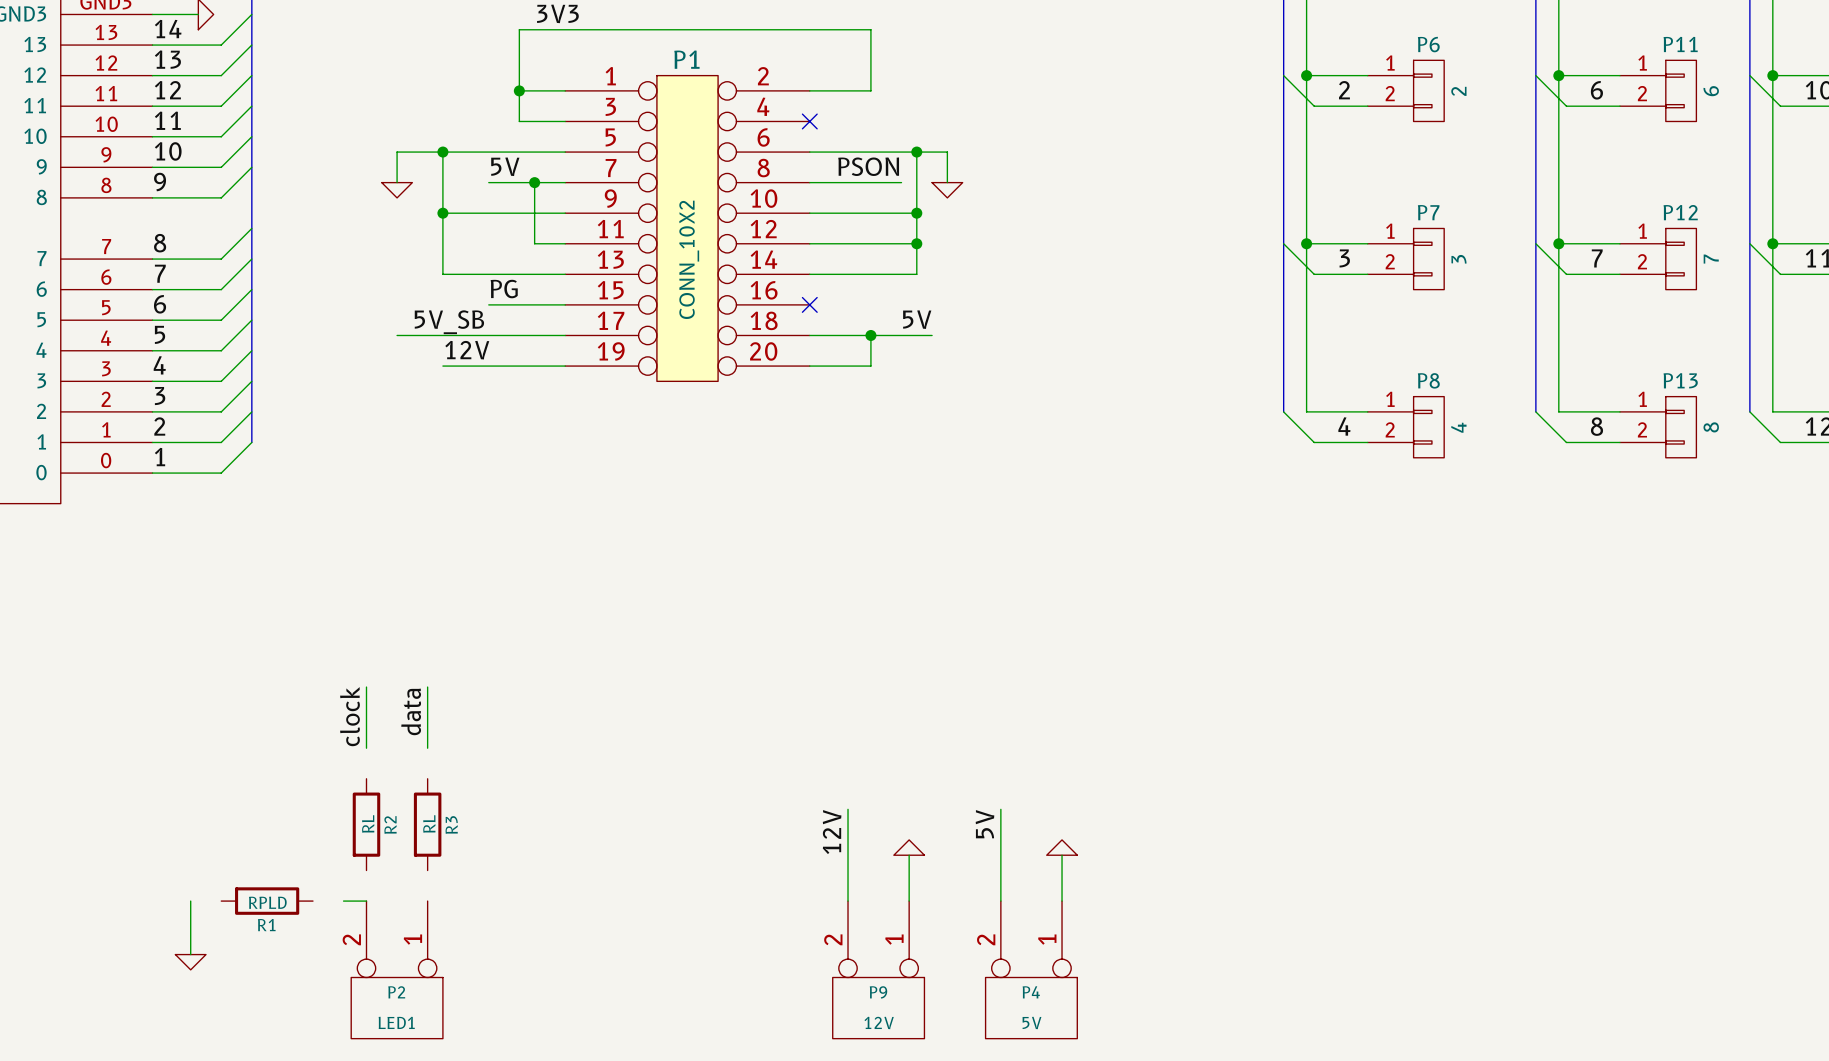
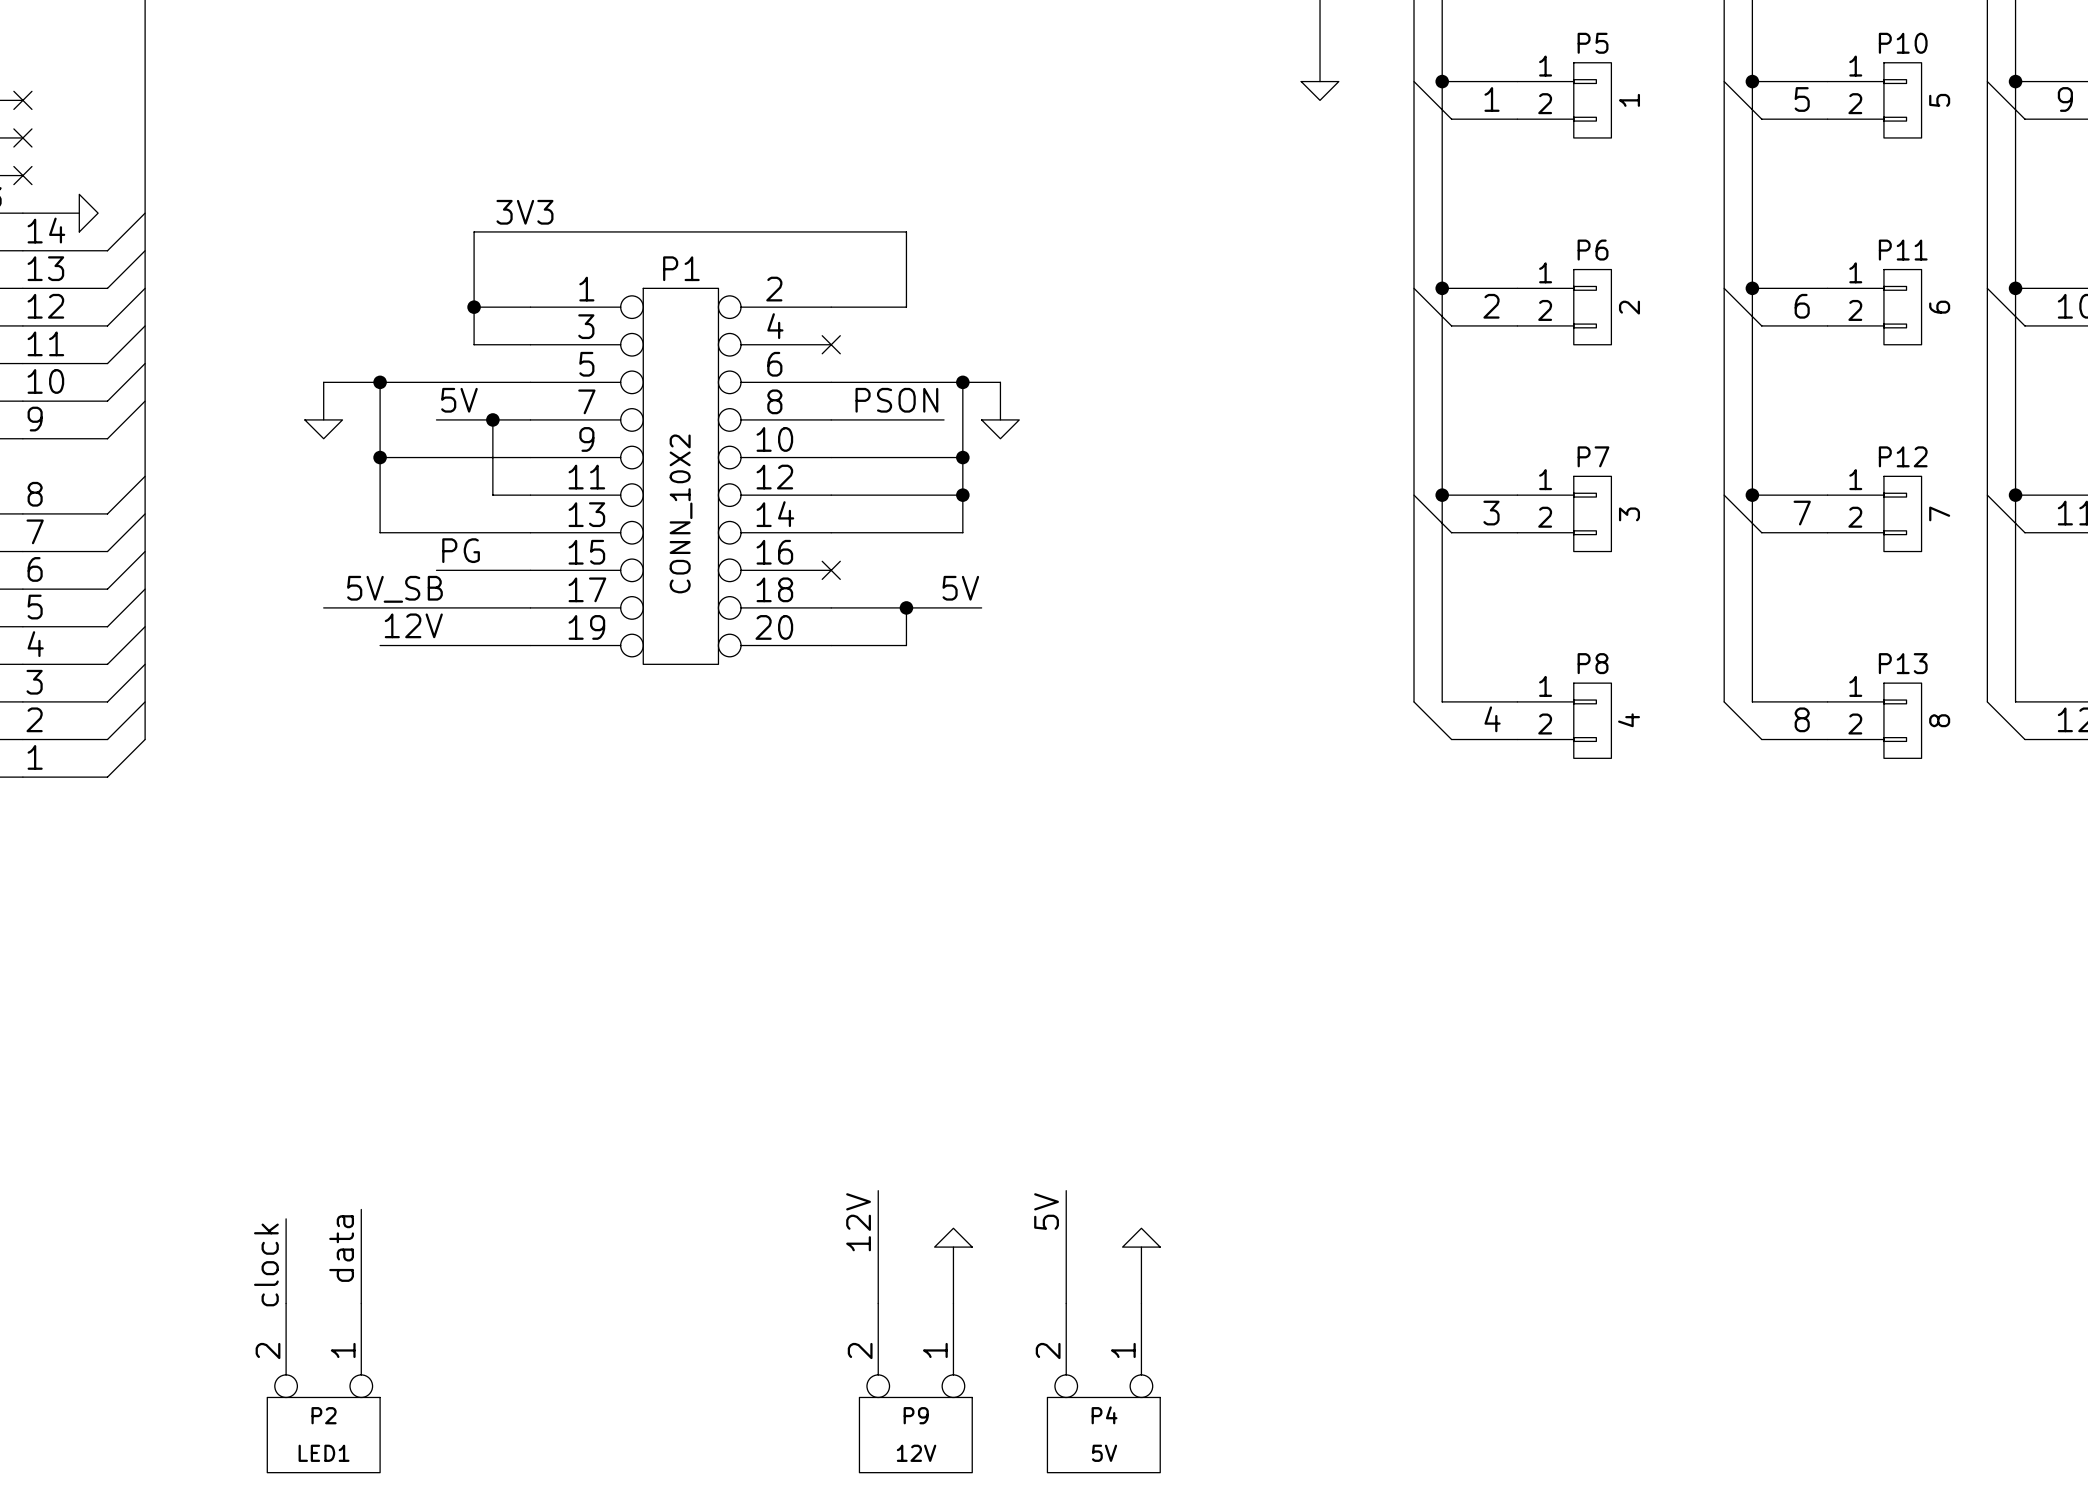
wire: (366, 687) (366, 748) -> none
wire: (427, 687) (427, 748) -> none
label position: data (411, 711) -> data (341, 1248)
label position: clock (349, 716) -> clock (266, 1264)
R2: RL (366, 824) -> none
wire: none -> (361, 1209) (361, 1303)
R3: RL (427, 824) -> none
wire: (190, 901) (190, 954) -> none
R1: RPLD (267, 901) -> none
wire: (343, 901) (366, 901) -> (286, 1218) (286, 1303)
power symbol: (190, 962) -> none

